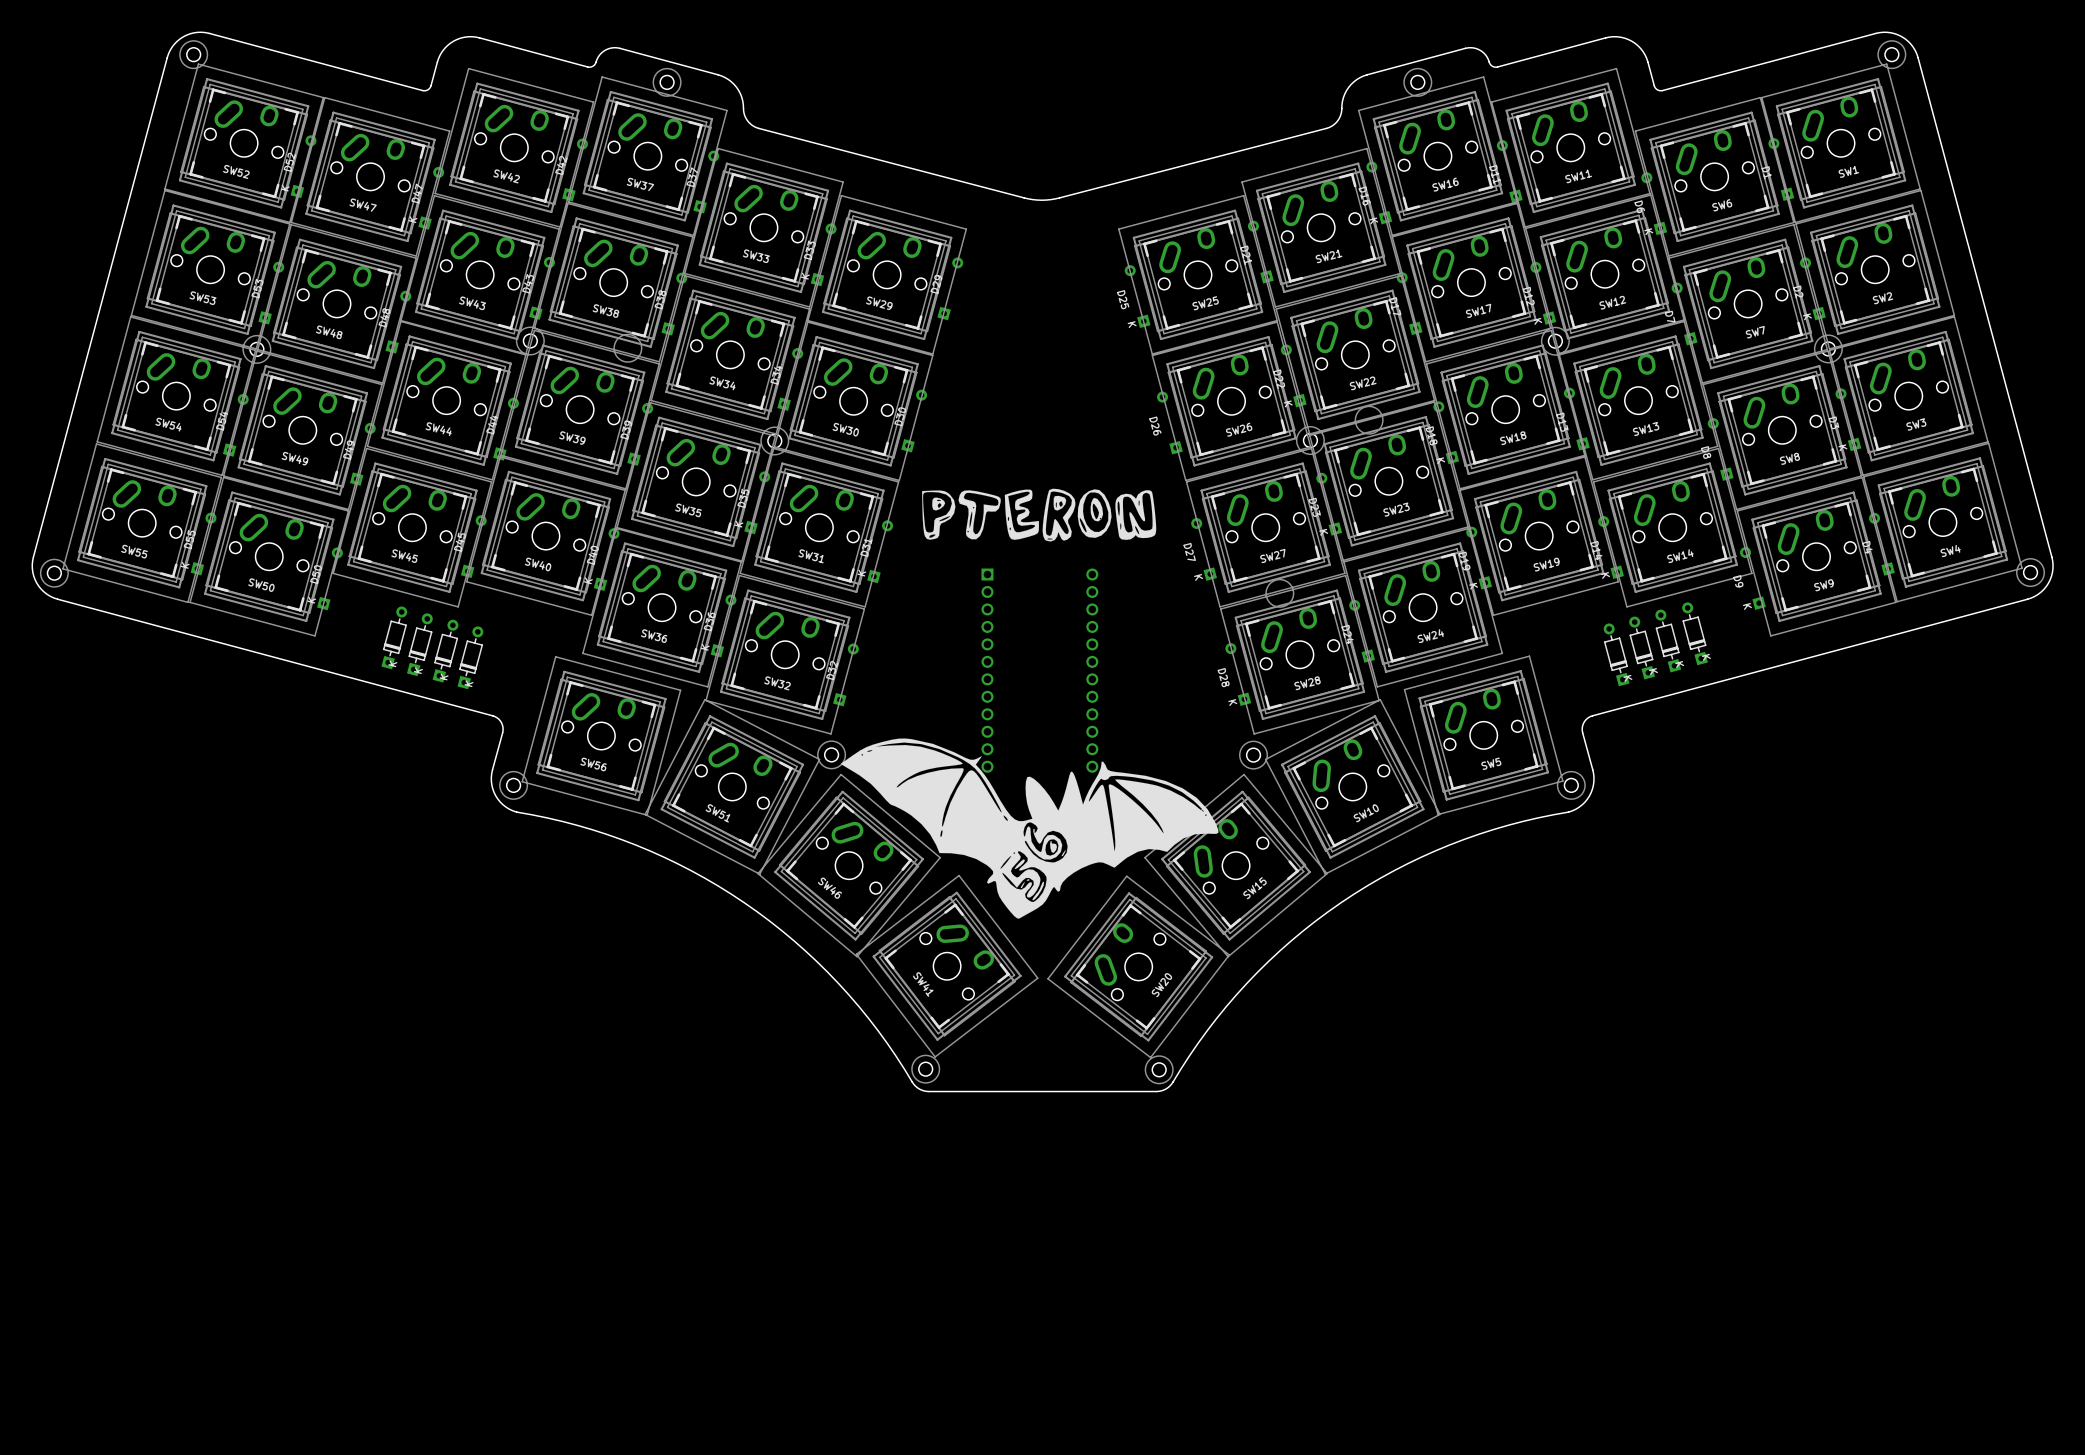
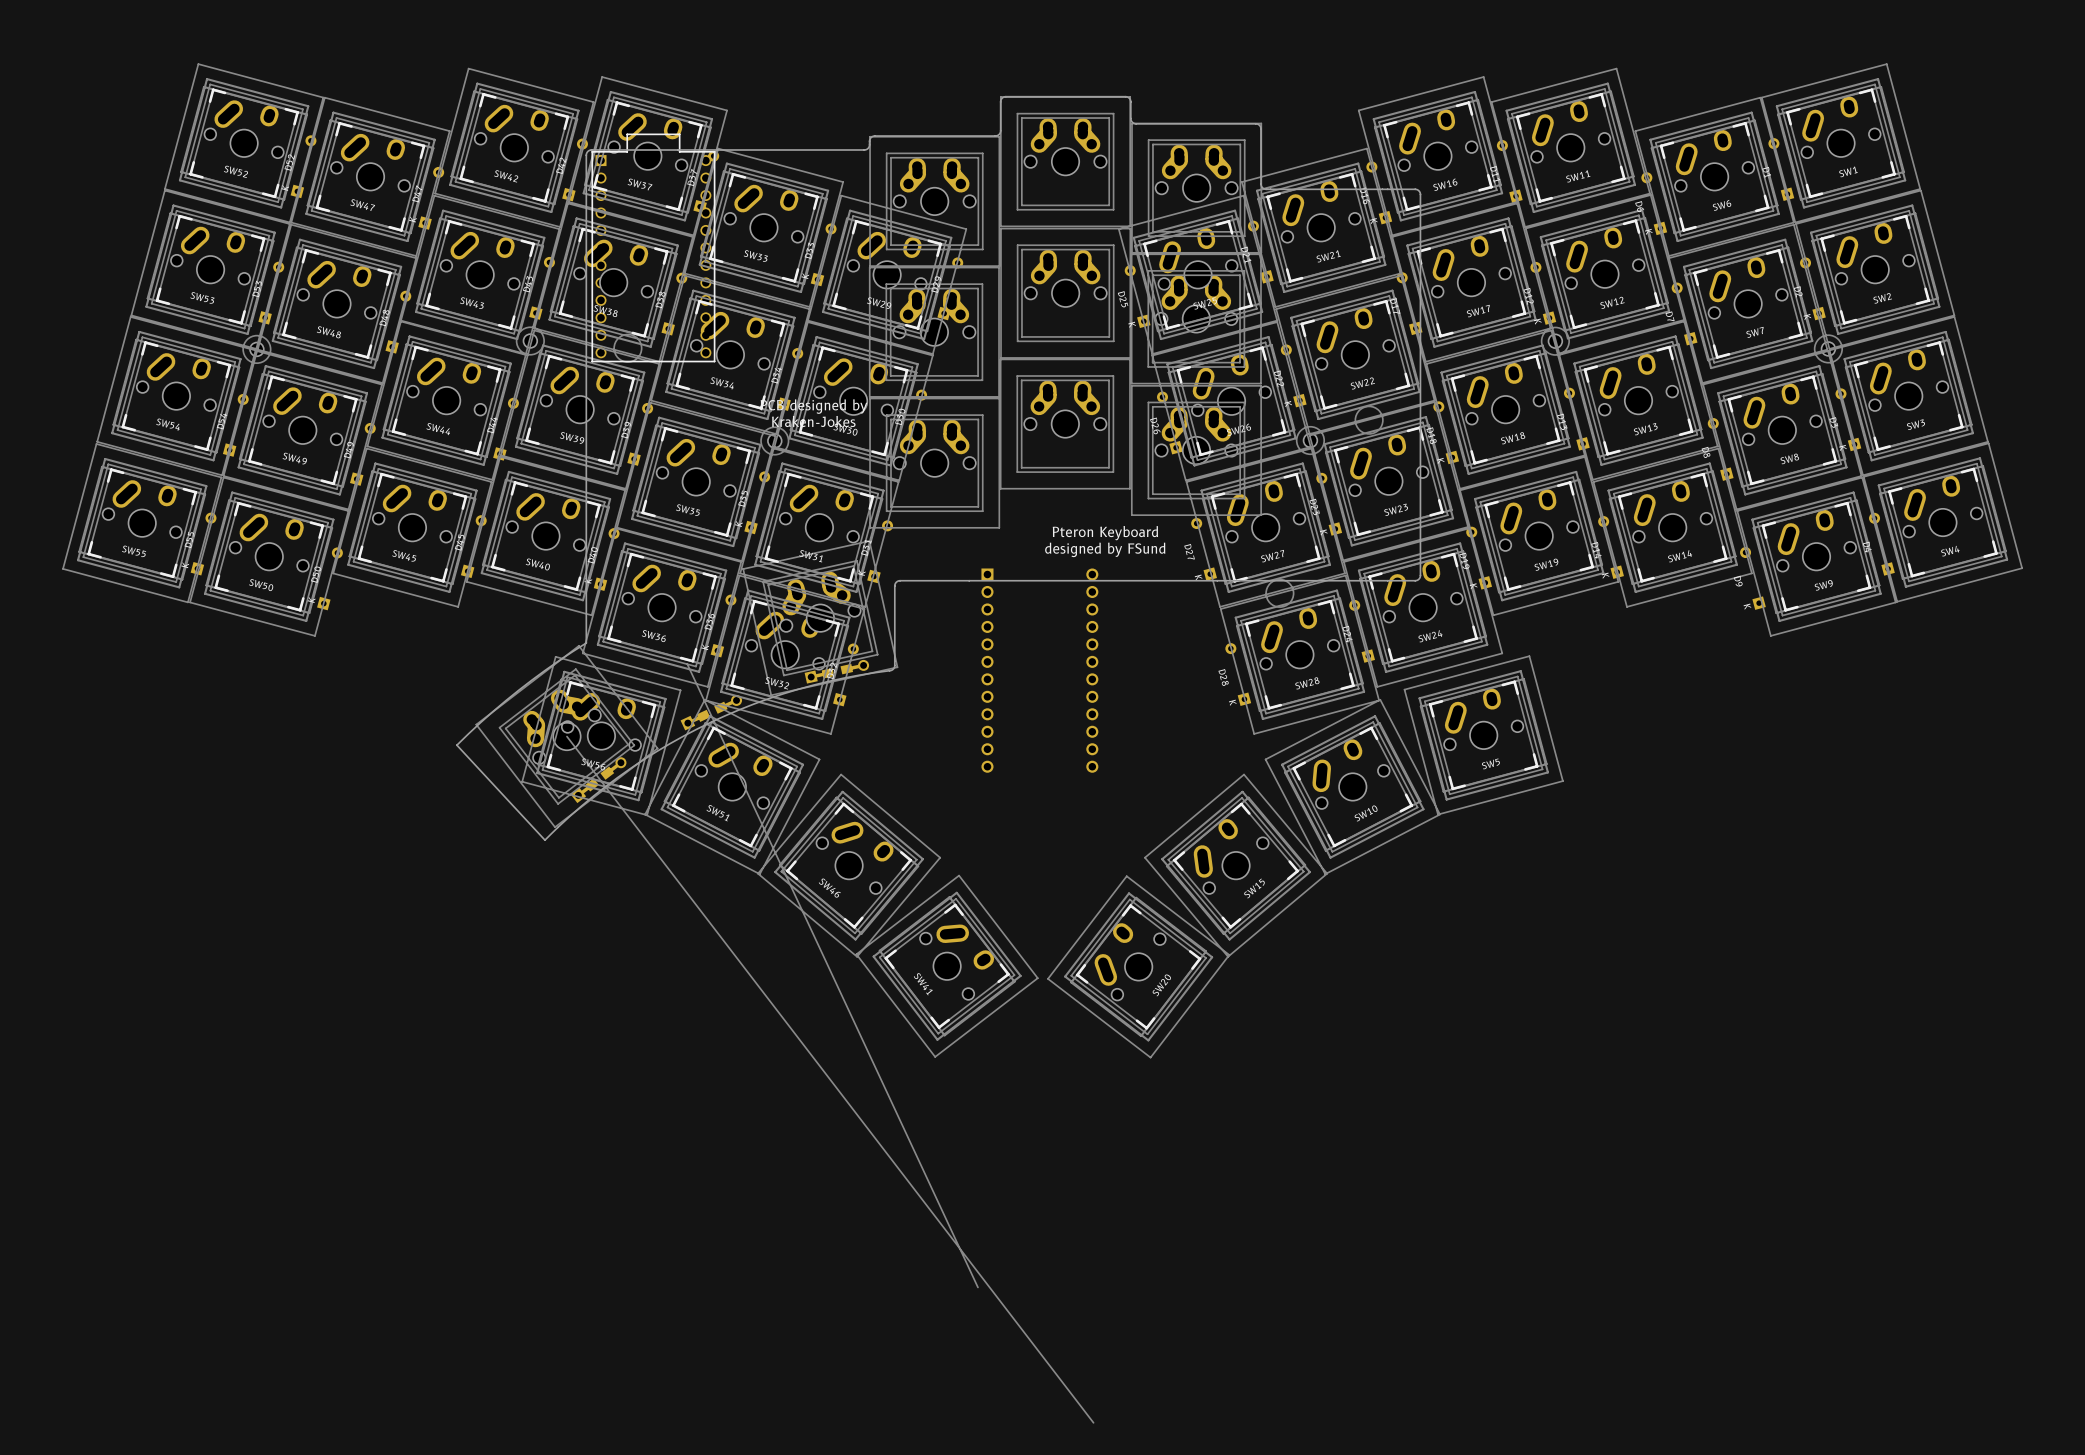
board edge: (209, 33) (424, 90) (430, 86) (442, 51) (453, 41) (464, 37) (479, 37) (589, 67) (594, 64) (599, 55) (605, 50) (619, 48) (725, 77) (738, 90) (745, 117) (756, 127) (1023, 197) (1041, 200) (1059, 197) (1328, 127) (1339, 117) (1346, 90) (1360, 77) (1467, 47) (1482, 51) (1490, 64) (1496, 67) (1605, 37) (1621, 37) (1635, 43) (1643, 51) (1654, 86) (1660, 90) (1875, 33) (1894, 33) (1908, 41) (1918, 57) (2051, 557) (2051, 576) (2043, 589) (2027, 599) (1589, 717) (1583, 723) (1582, 731) (1593, 781) (1589, 796) (1582, 804) (1568, 812) (1508, 825) (1449, 845) (1393, 871) (1340, 902) (1291, 940) (1246, 983) (1207, 1030) (1171, 1084) (1163, 1090) (923, 1090) (913, 1084) (878, 1030) (838, 983) (793, 940) (744, 902) (691, 871) (635, 845) (577, 825) (516, 812) (503, 804) (494, 792) (491, 781) (502, 731) (501, 722) (496, 717) (57, 599) (47, 594) (38, 586) (32, 572) (33, 557) (167, 57) (174, 44) (183, 36) (194, 32) (209, 33) -> none
part: (193, 54) -> none
part: (1891, 54) -> none
part: (667, 82) -> none
part: (1417, 82) -> none
board edge: none -> (1005, 96) (1126, 96) (1130, 100) (1130, 119) (1134, 123) (1257, 124) (1261, 129) (1261, 184) (1264, 189) (1415, 189) (1419, 191) (1419, 578) (1415, 580) (898, 580) (894, 585) (894, 665) (892, 669) (828, 681) (783, 693) (739, 709) (697, 729) (656, 751) (617, 777) (581, 806) (544, 840) (456, 745) (518, 690) (586, 643) (587, 152) (591, 149) (864, 149) (868, 147) (869, 139) (874, 136) (996, 135) (1000, 131) (1000, 100) (1005, 96)
part: none -> (1065, 161)
part: none -> (1196, 188)
part: none -> (934, 201)
part: none -> (653, 247)
part: none -> (1065, 293)
part: none -> (1196, 318)
part: none -> (934, 332)
text: none -> PCB designed by (813, 406)
text: none -> Kraken-Jokes (813, 421)
part: none -> (1065, 424)
part: none -> (1196, 450)
part: none -> (934, 463)
drawing: [922, 488, 1157, 542] -> none
text: none -> Pteron Keyboard (1105, 533)
text: none -> designed by FSund (1105, 549)
part: (2030, 572) -> none
part: (54, 573) -> none
part: none -> (820, 618)
part: (1695, 633) -> none
part: (394, 637) -> none
part: (1668, 641) -> none
part: (419, 644) -> none
part: (1642, 648) -> none
part: (445, 651) -> none
part: (1616, 654) -> none
part: (470, 657) -> none
line: none -> (687, 663) (977, 1287)
part: none -> (836, 671)
part: none -> (711, 712)
line: none -> (566, 736) (1093, 1422)
part: none -> (566, 736)
drawing: [840, 738, 1219, 919] -> none
part: (831, 754) -> none
part: (1253, 755) -> none
part: none -> (598, 780)
part: (513, 785) -> none
part: (1571, 785) -> none
part: (925, 1069) -> none
part: (1159, 1069) -> none

